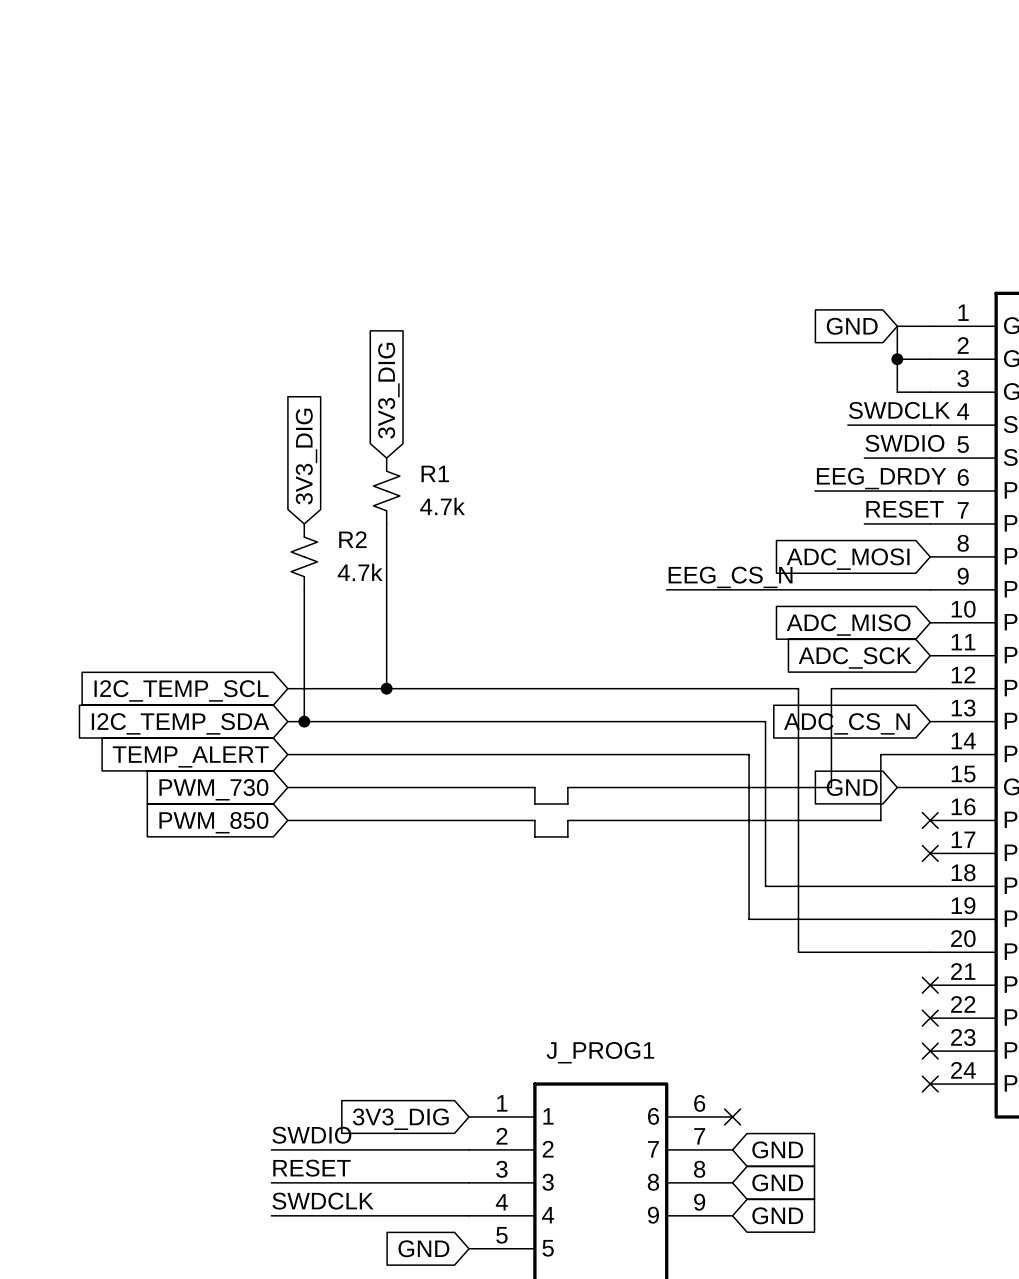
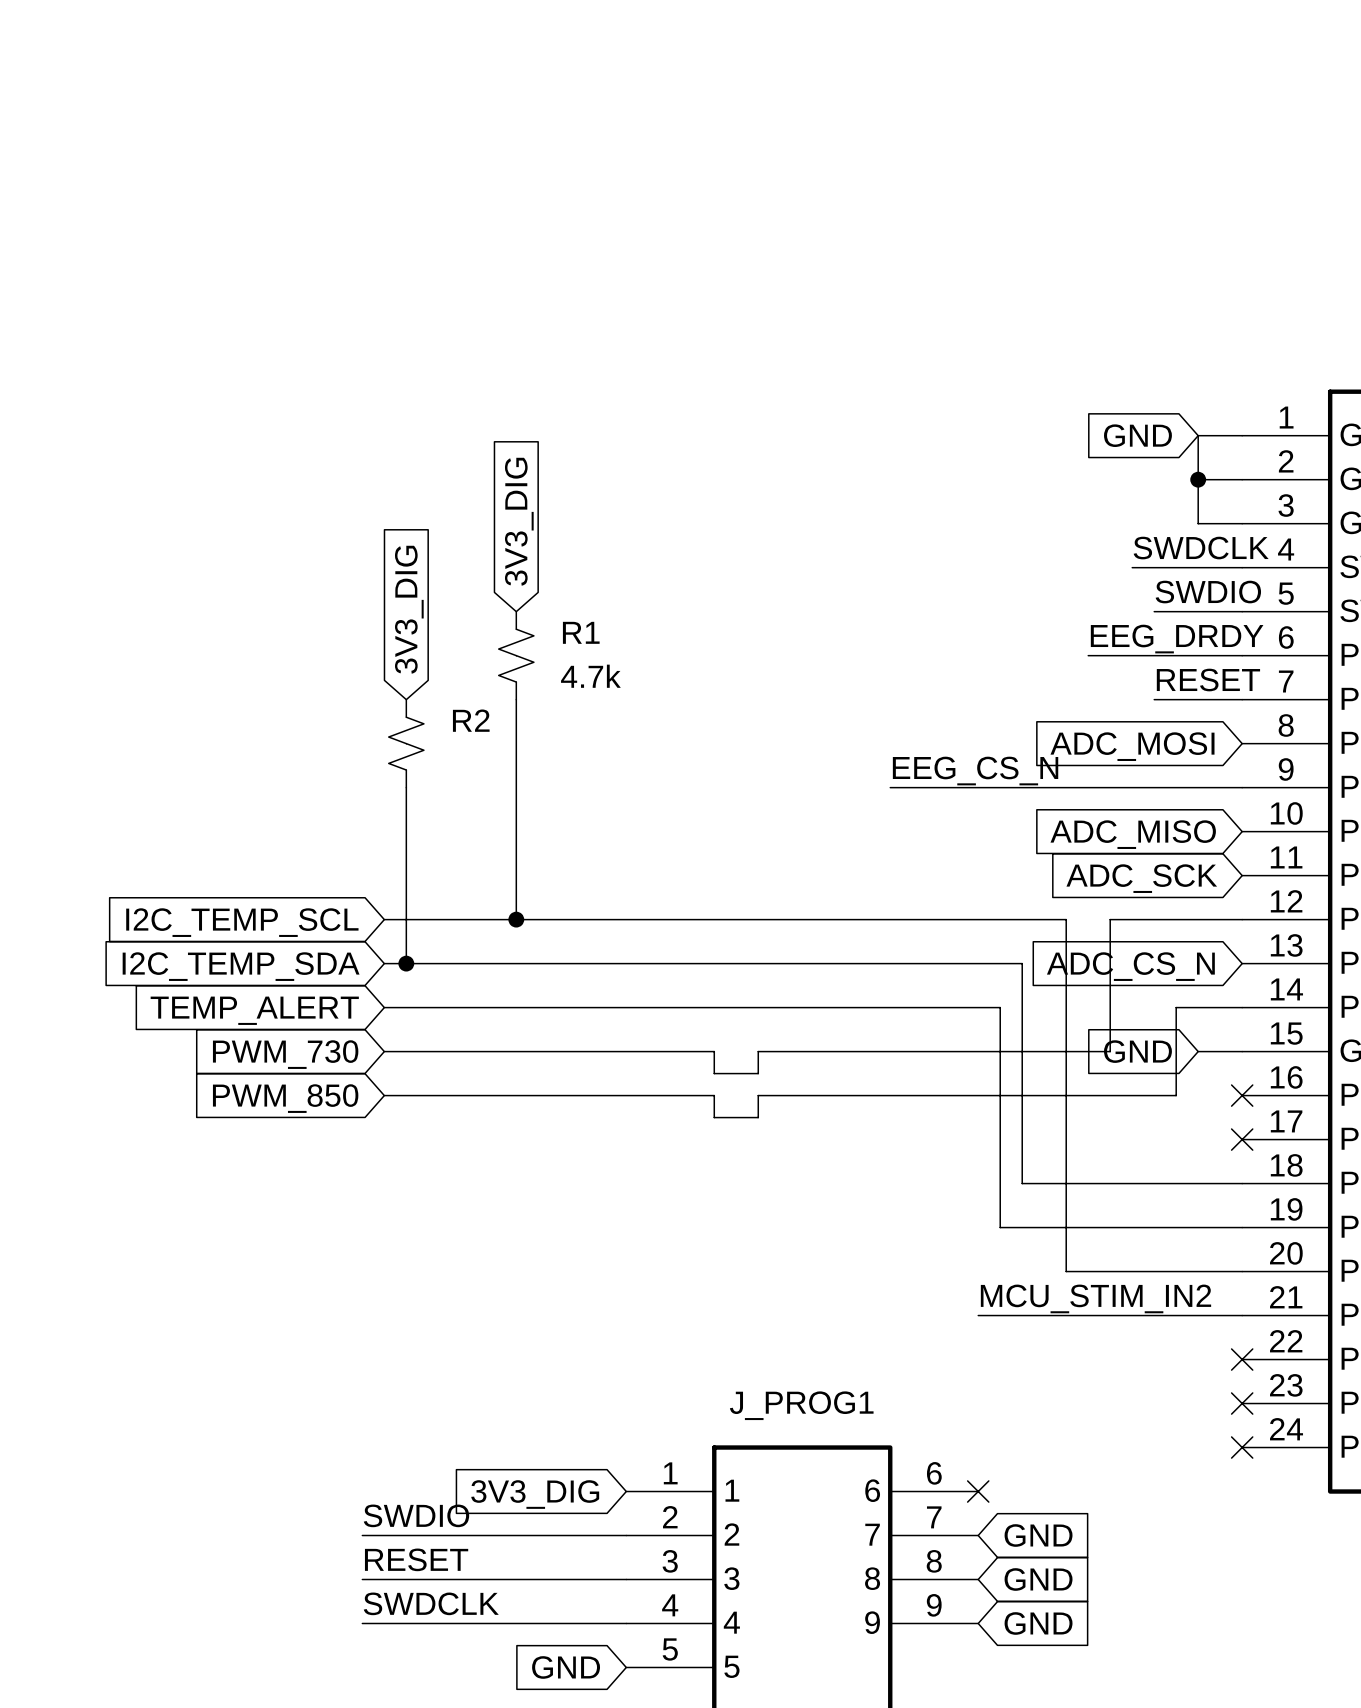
R2 value: 4.7k (360, 572) -> none
label: none -> MCU_STIM_IN2 (1095, 1298)
wire: none -> (978, 1315) (1242, 1315)
no-connect mark: (930, 985) -> none

